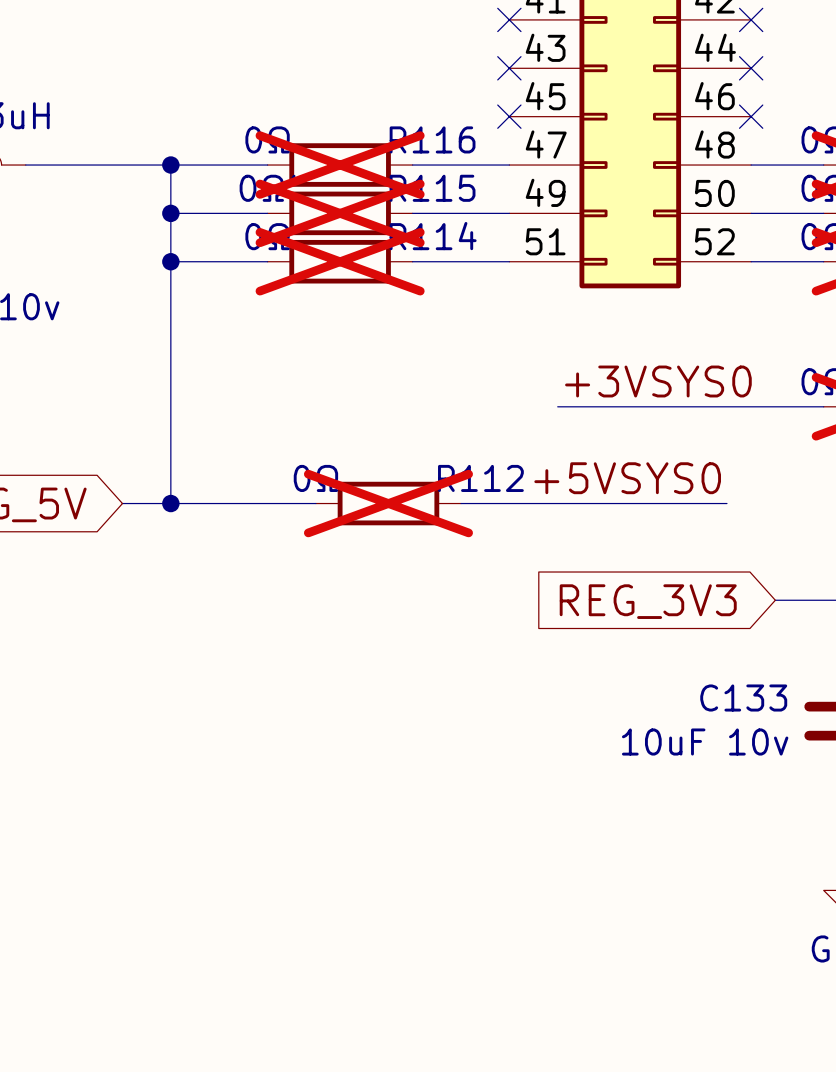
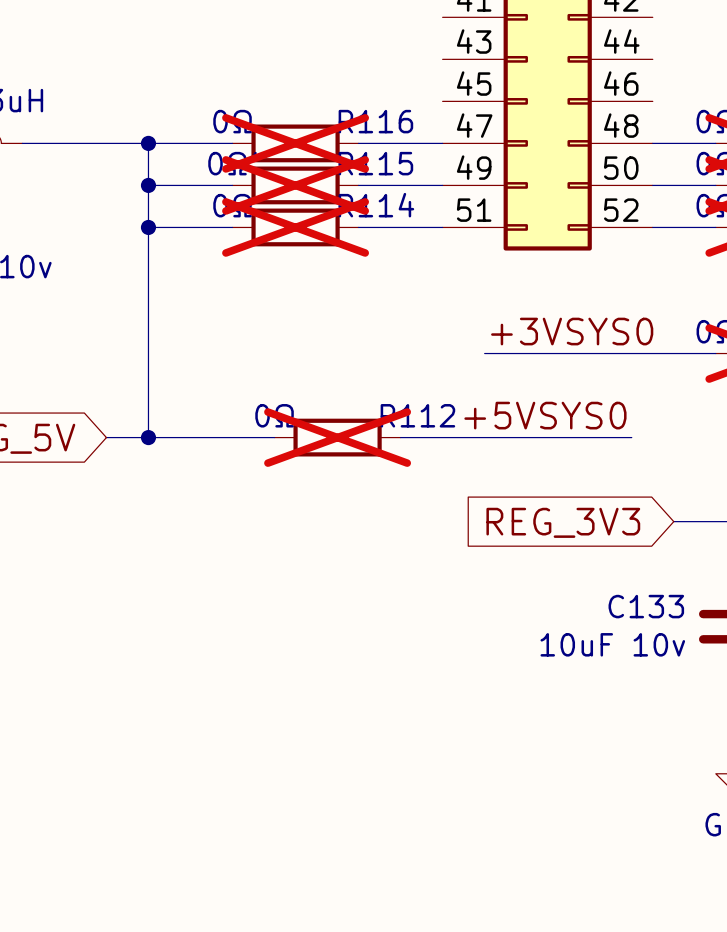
no-connect mark: (509, 19) -> none
no-connect mark: (751, 19) -> none
no-connect mark: (509, 68) -> none
no-connect mark: (751, 68) -> none
no-connect mark: (509, 116) -> none
no-connect mark: (751, 116) -> none

